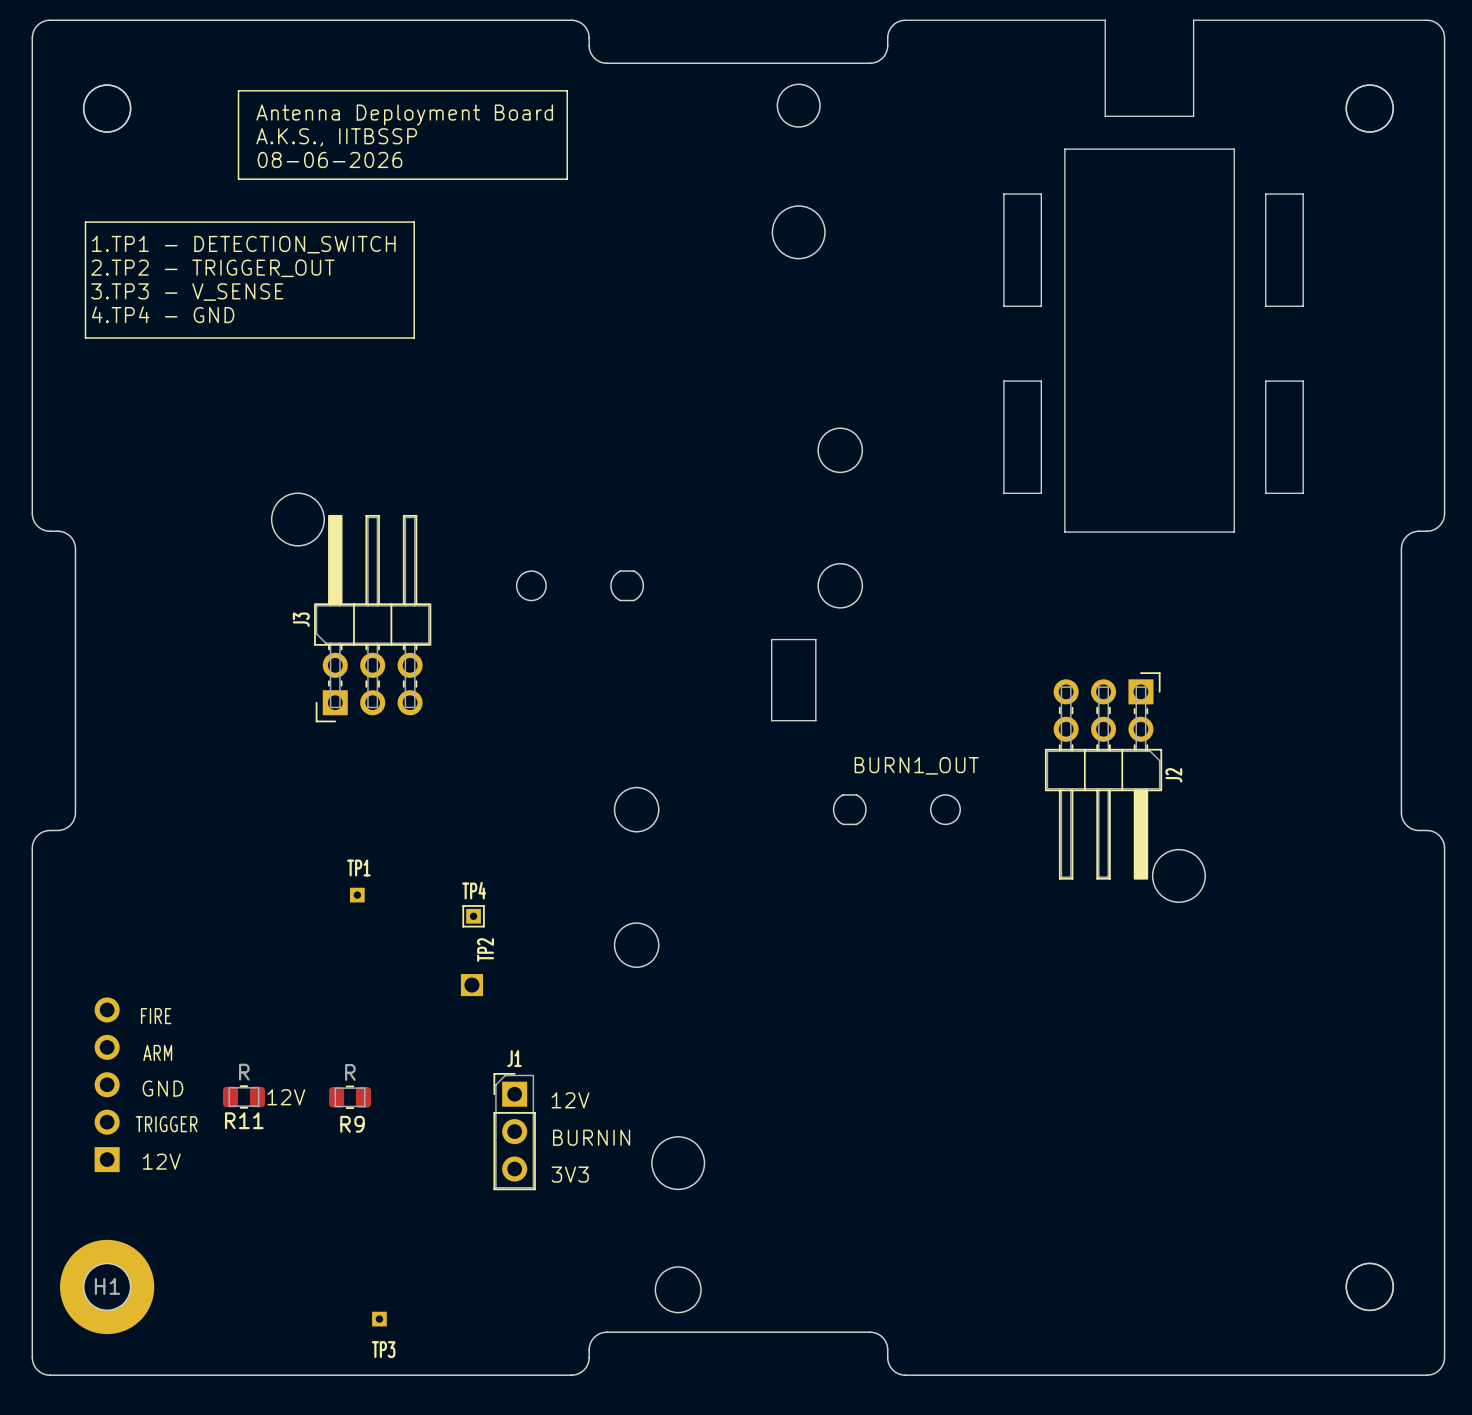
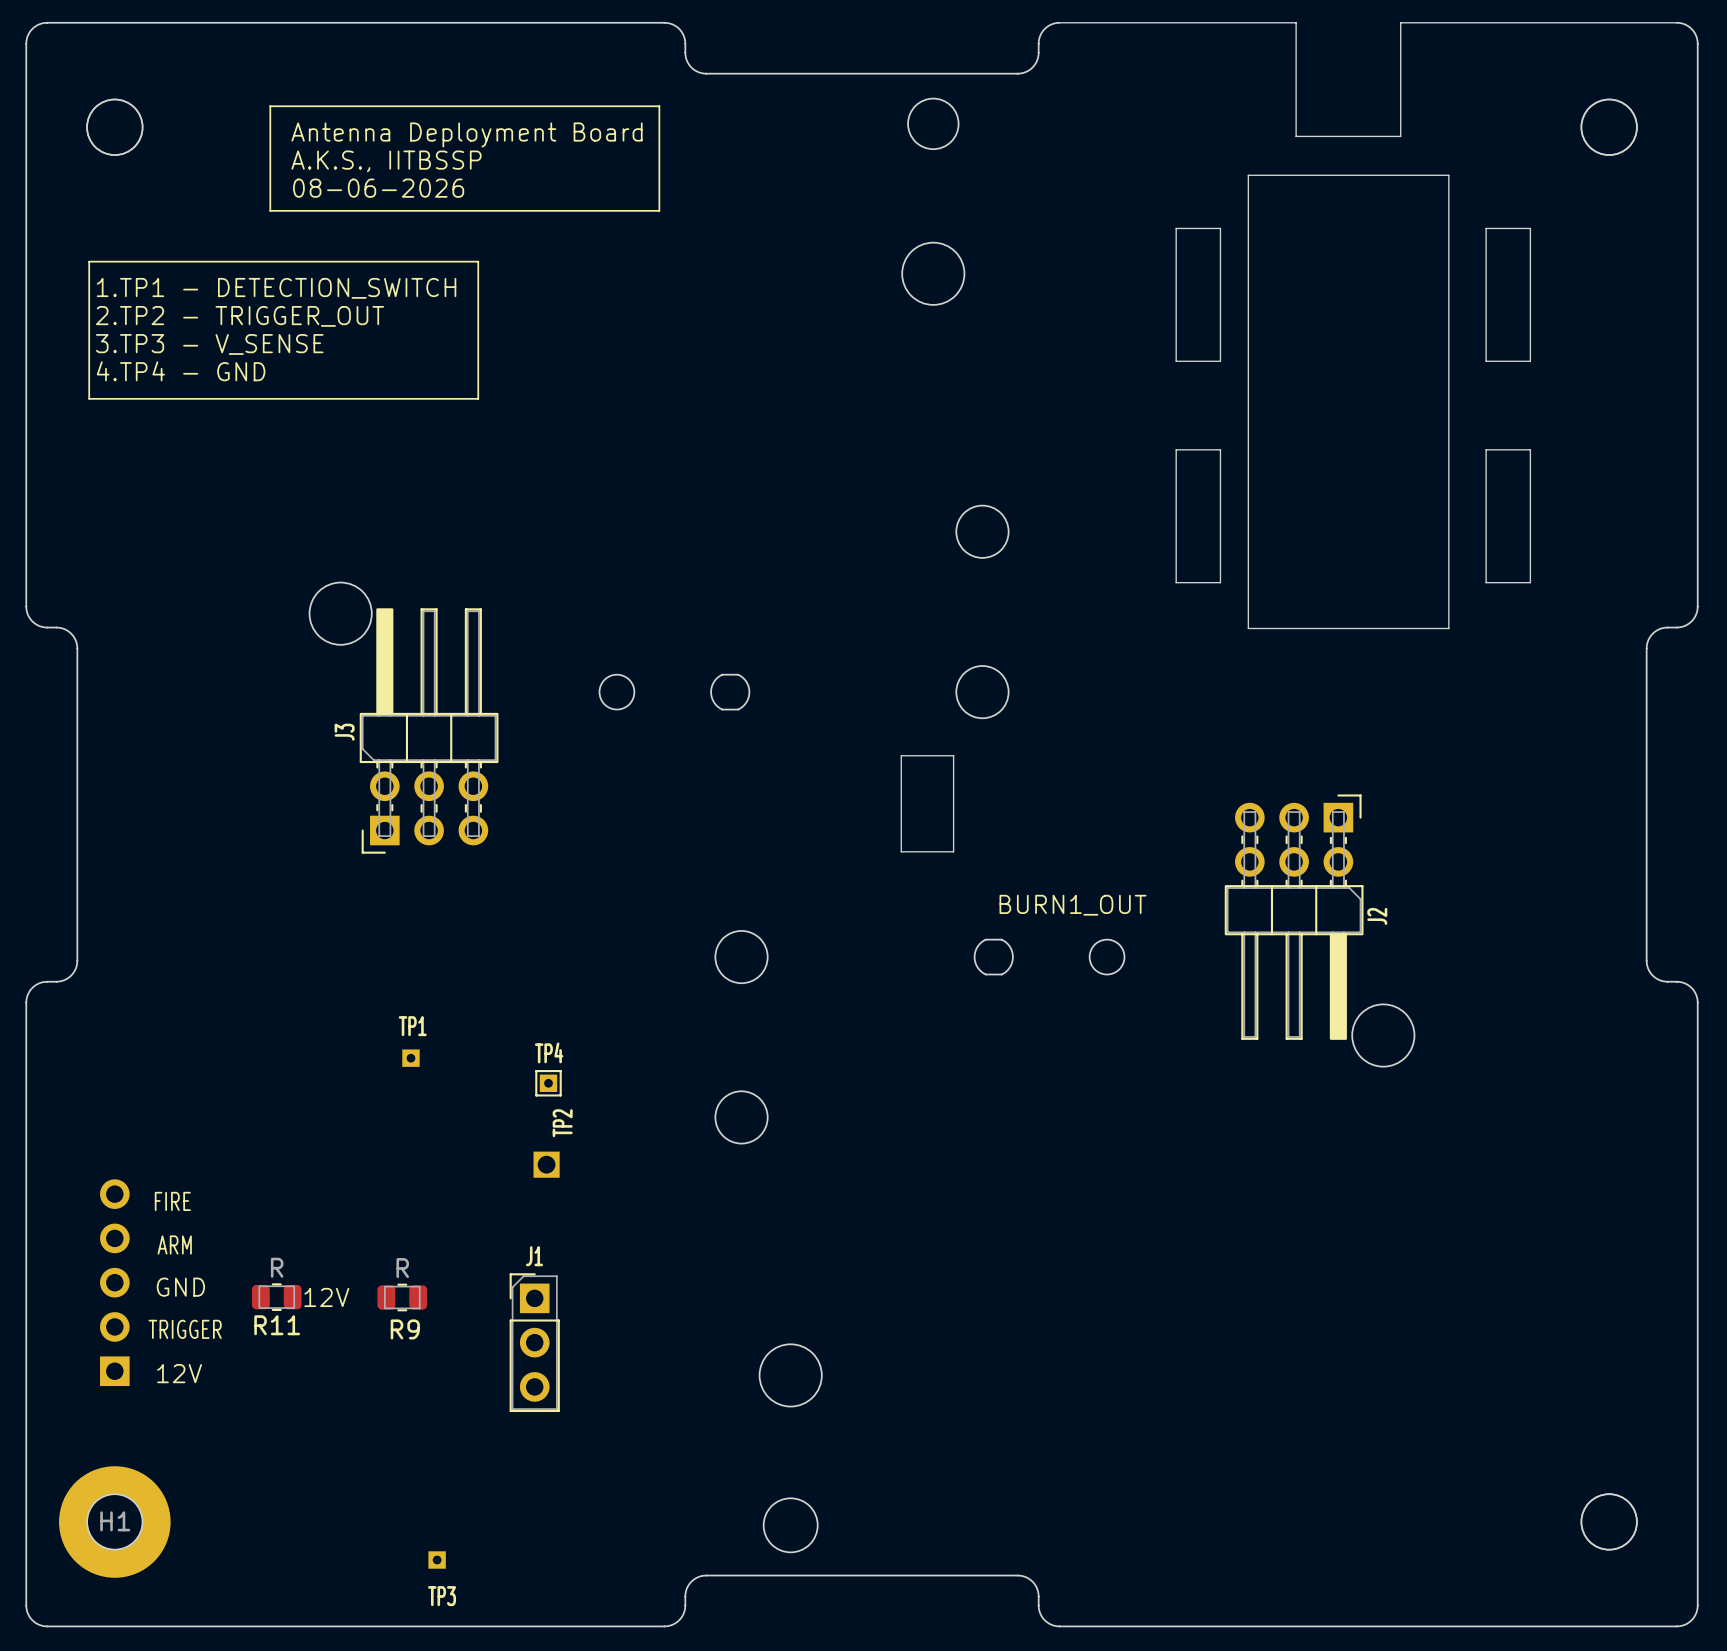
text: 12V (570, 1100) -> none
J1 position: (514, 1131) -> (534, 1342)
text: BURNIN (591, 1137) -> none
text: 3V3 (570, 1174) -> none

